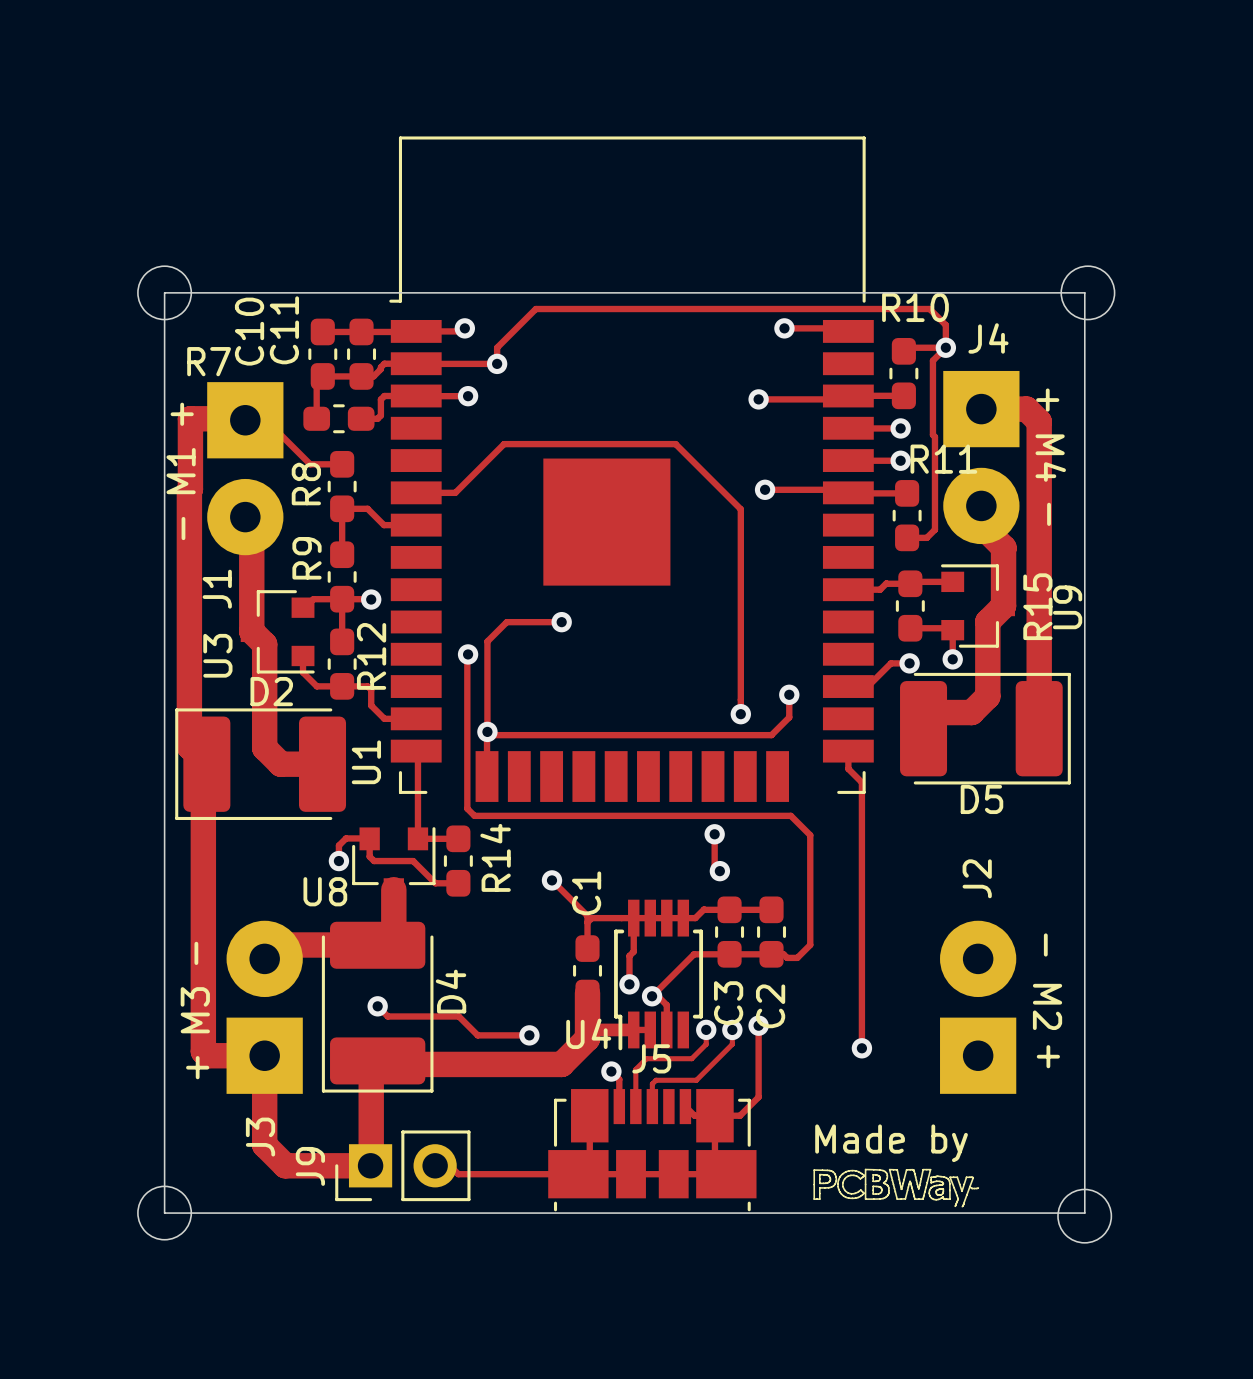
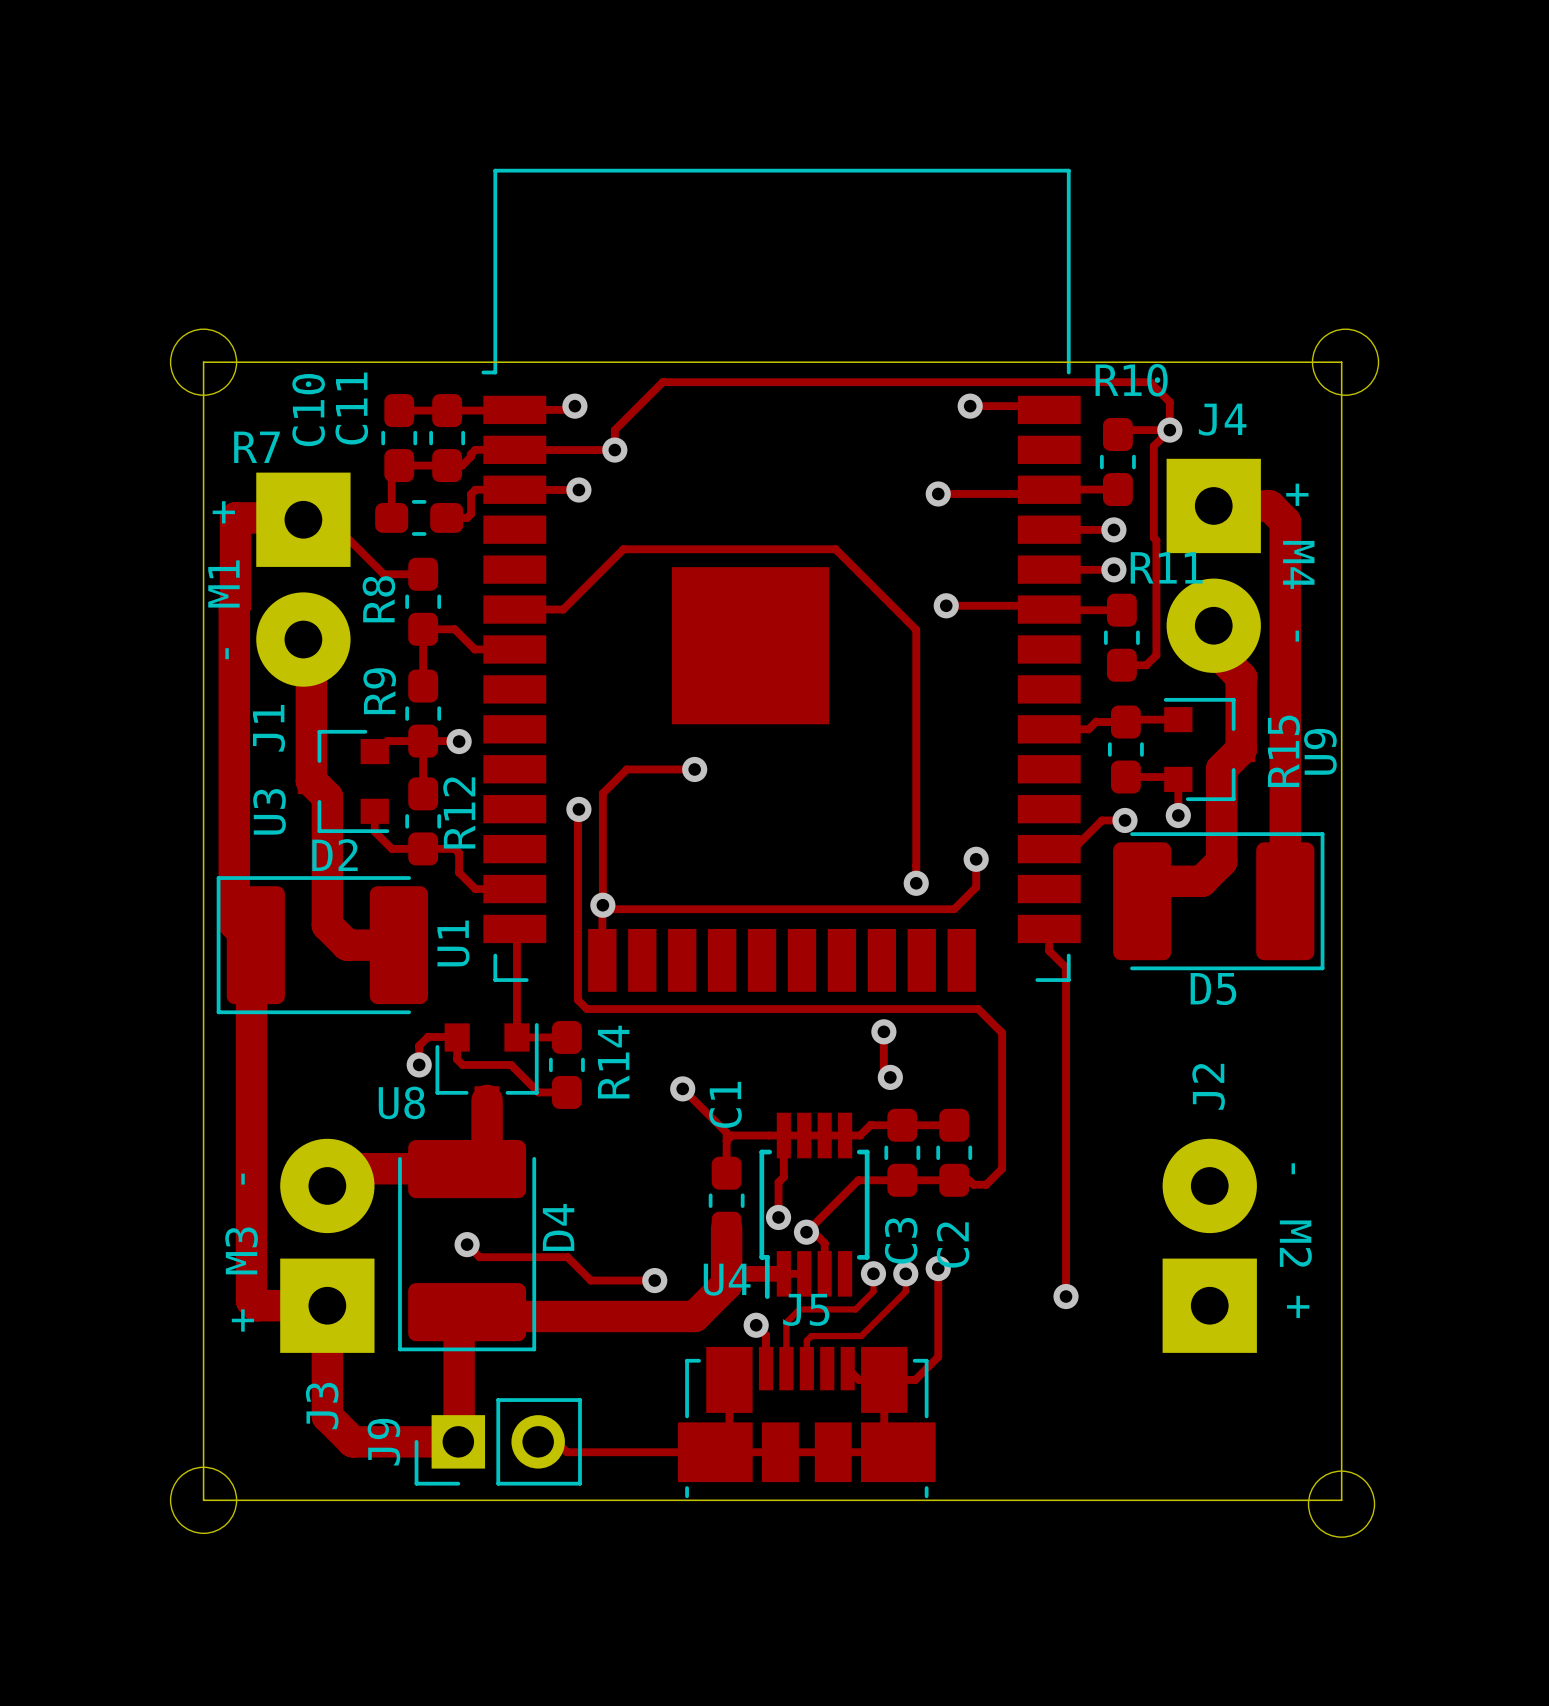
text: Made by (891, 1143) -> none
line: (865, 1169) (881, 1170) (886, 1172) (887, 1178) (883, 1182) (888, 1186) (888, 1192) (885, 1197) (865, 1199) (865, 1169) -> none
line: (814, 1170) (831, 1170) (836, 1177) (833, 1186) (819, 1187) (819, 1199) (814, 1199) (814, 1170) -> none
line: (852, 1170) (864, 1175) (860, 1178) (855, 1175) (850, 1175) (843, 1180) (843, 1186) (847, 1192) (854, 1193) (860, 1190) (864, 1193) (859, 1197) (852, 1198) (842, 1194) (837, 1183) (841, 1174) (852, 1170) -> none
line: (819, 1174) (819, 1183) (830, 1181) (828, 1175) (819, 1174) -> none
line: (873, 1174) (873, 1181) (879, 1180) (879, 1176) (873, 1174) -> none
line: (937, 1176) (949, 1180) (949, 1199) (943, 1197) (934, 1199) (929, 1196) (931, 1187) (943, 1184) (939, 1181) (931, 1182) (931, 1177) (937, 1176) -> none
line: (910, 1181) (914, 1199) (922, 1199) (930, 1169) (923, 1169) (918, 1188) (913, 1170) (906, 1169) (901, 1189) (897, 1169) (889, 1169) (897, 1199) (905, 1198) (909, 1181) -> none
line: (873, 1186) (873, 1194) (881, 1192) (880, 1187) (873, 1186) -> none
line: (971, 1187) (978, 1187) -> none
line: (940, 1189) (936, 1190) (937, 1194) (942, 1193) (943, 1188) (940, 1189) -> none
line: (955, 1204) (958, 1198) (950, 1177) (957, 1177) (962, 1191) (966, 1177) (972, 1177) (962, 1206) -> none

